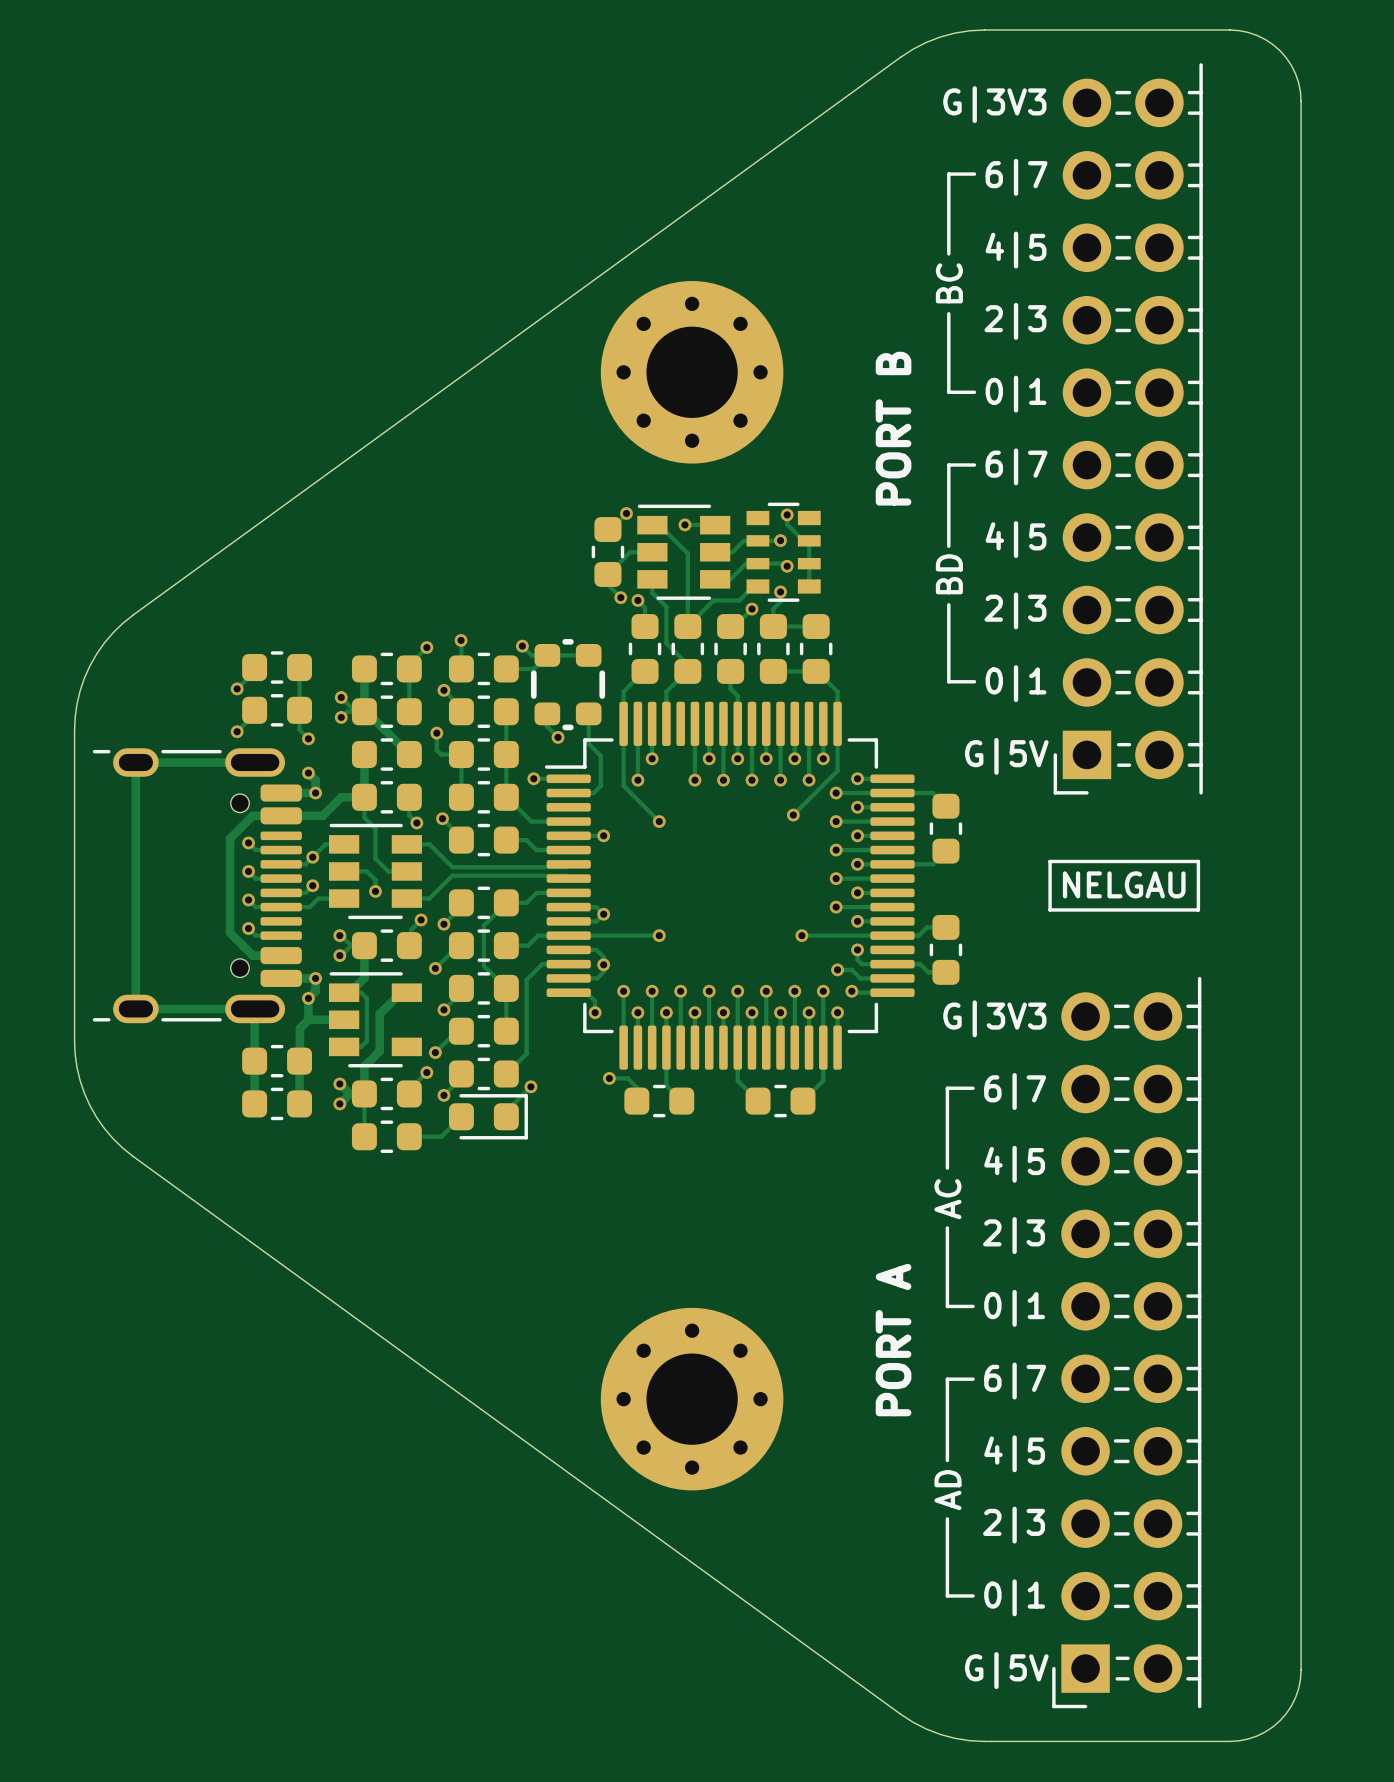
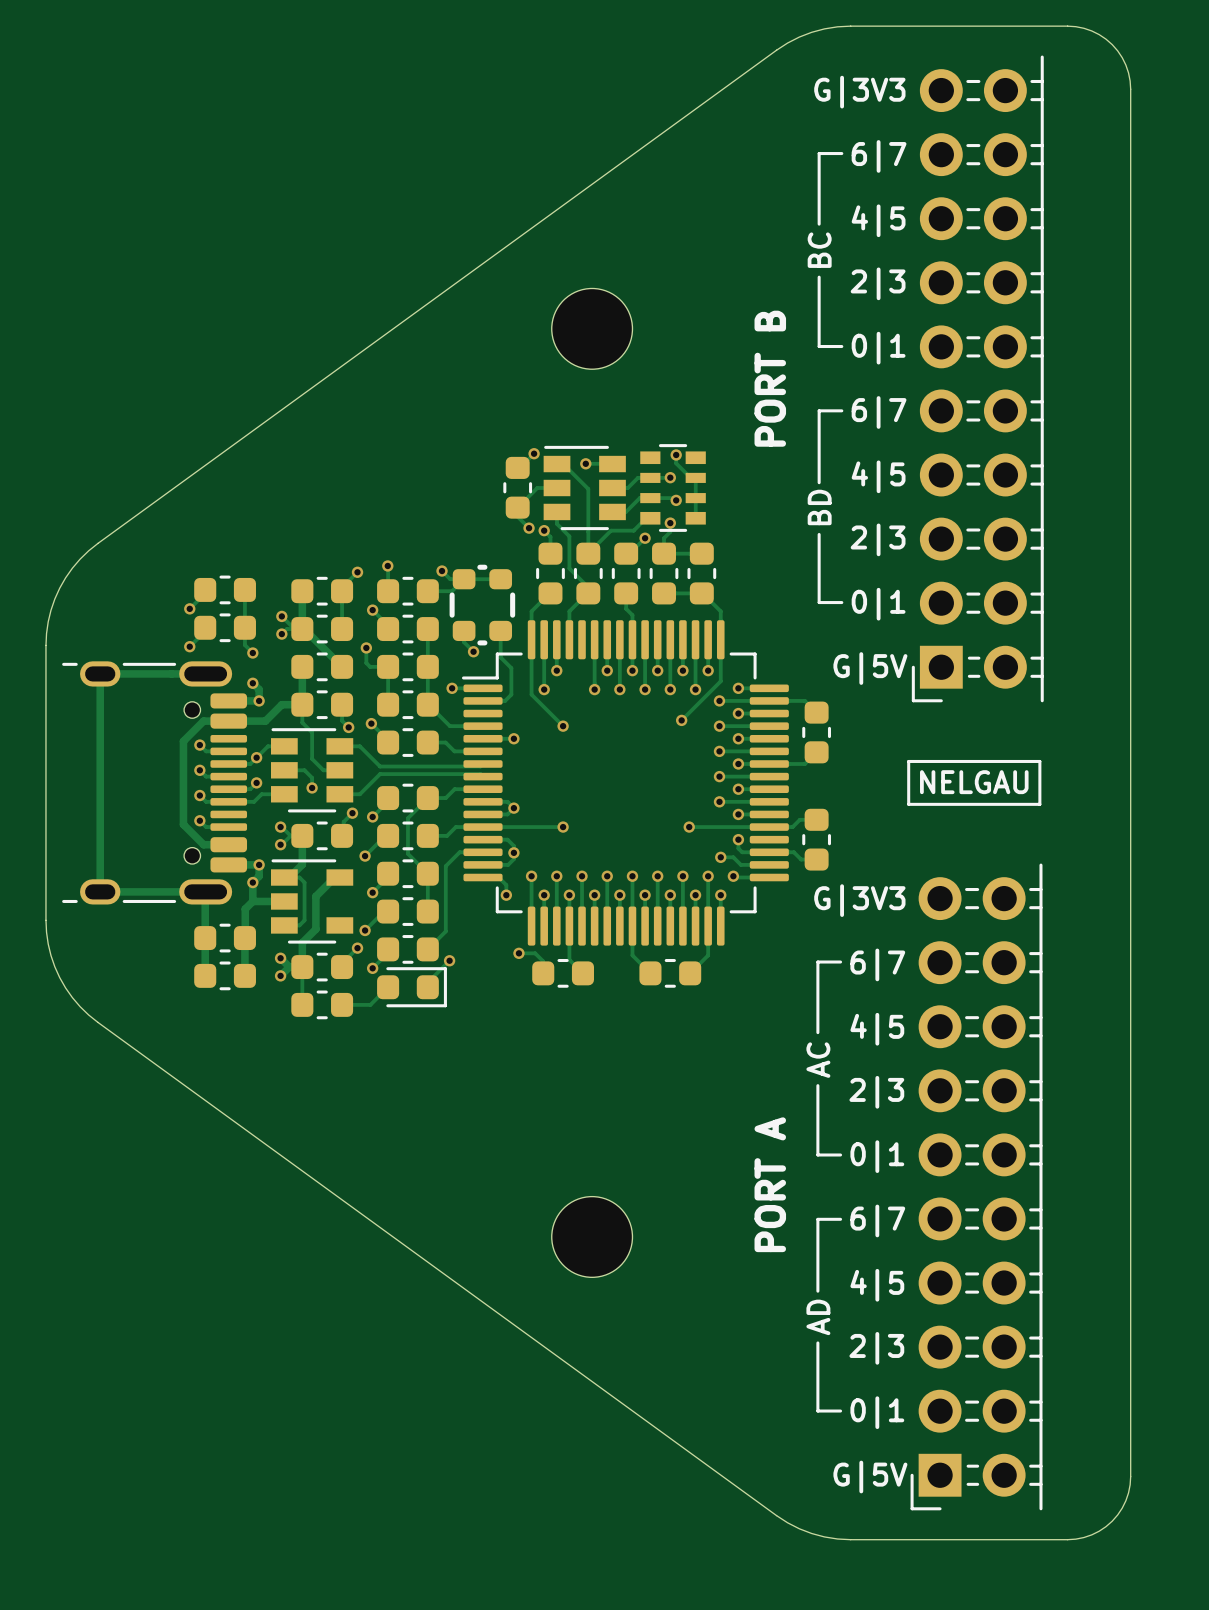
part footprint: [600, 281, 784, 464] -> [551, 288, 633, 370]
part footprint: [600, 1307, 784, 1491] -> [551, 1196, 633, 1278]

